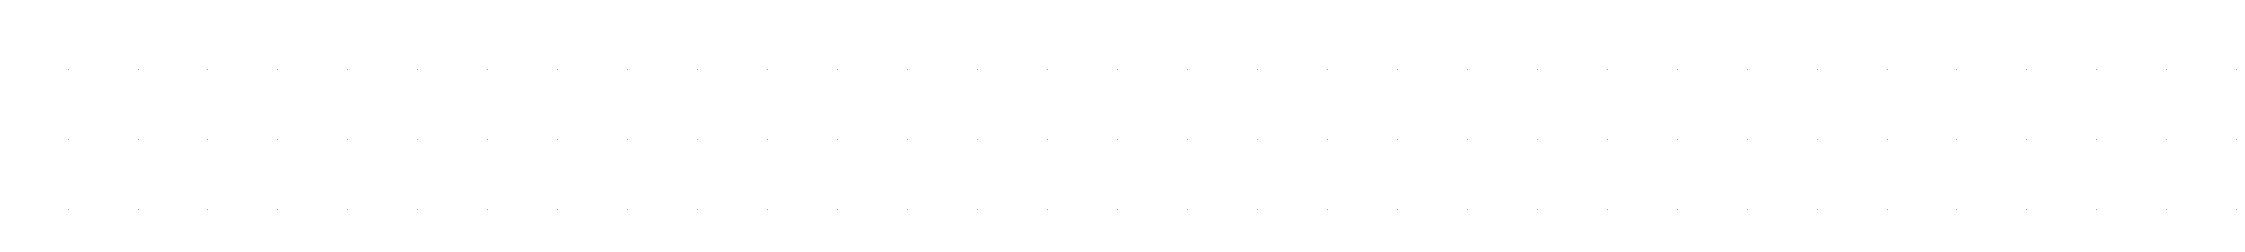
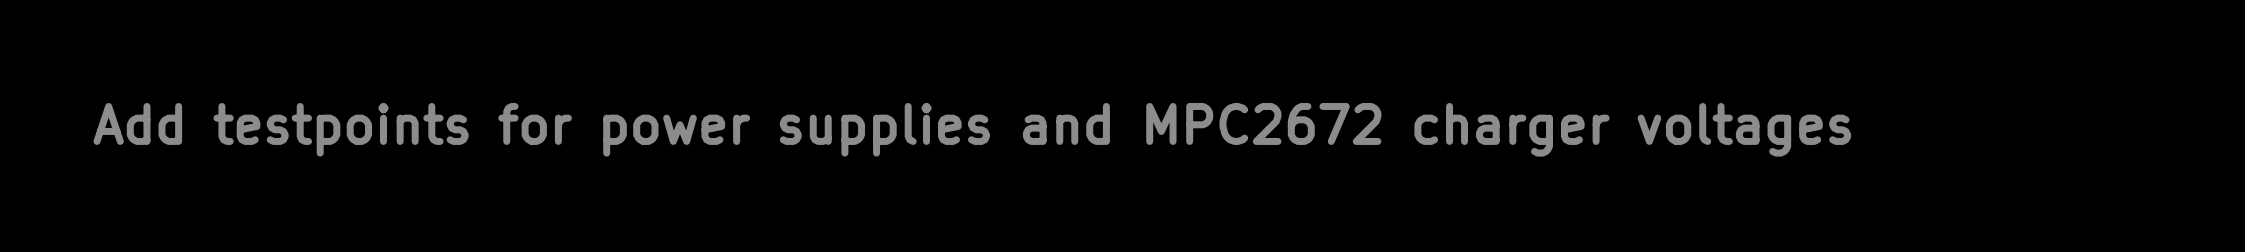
text: none -> Add testpoints for power supplies and MPC2672 charger voltages (972, 129)

